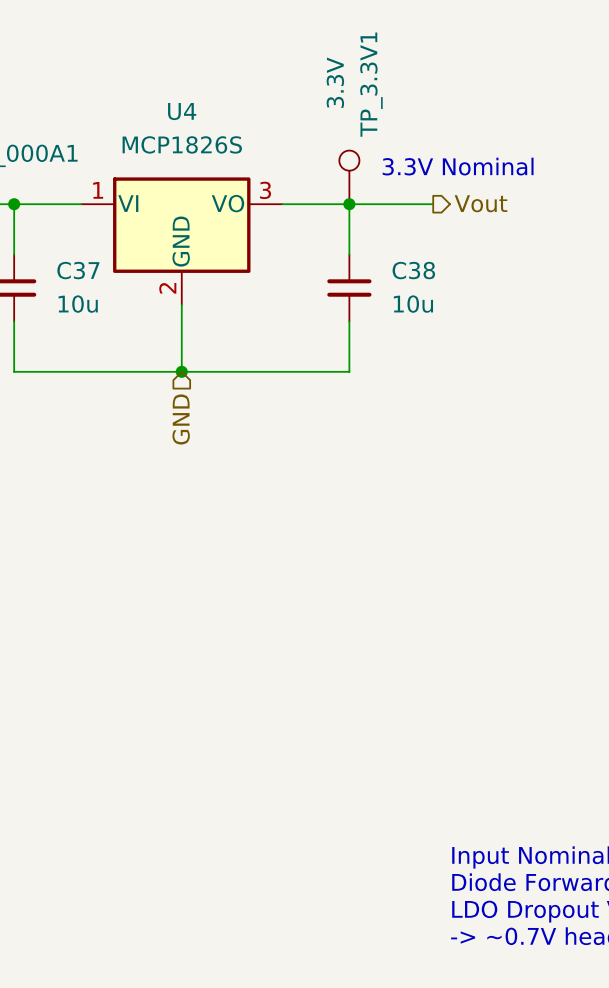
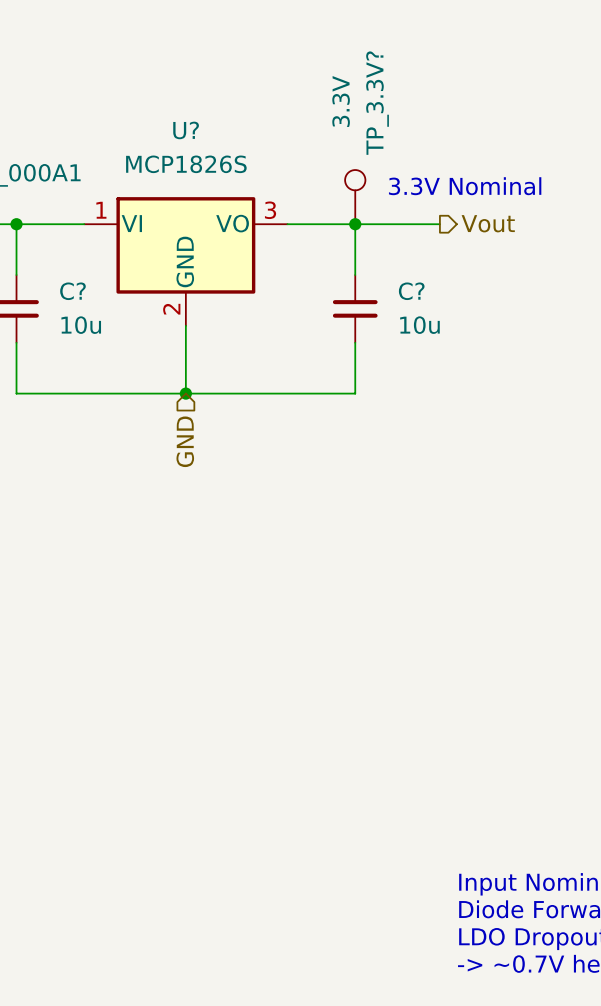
TP_3.3V1 name: TP_3.3V1 (371, 84) -> TP_3.3V? (377, 103)
U4 name: U4 (182, 111) -> U? (186, 130)
C37 name: C37 (78, 270) -> C? (72, 291)
C38 name: C38 (413, 270) -> C? (411, 291)

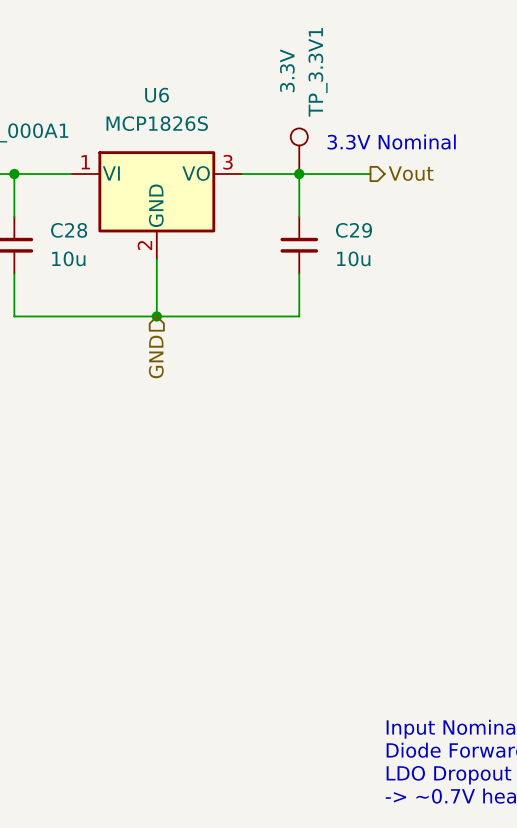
TP_3.3V? name: TP_3.3V? (377, 103) -> TP_3.3V1 (318, 72)
U? name: U? (186, 130) -> U6 (157, 95)
C? name: C? (72, 291) -> C28 (69, 230)
C? name: C? (411, 291) -> C29 (354, 230)

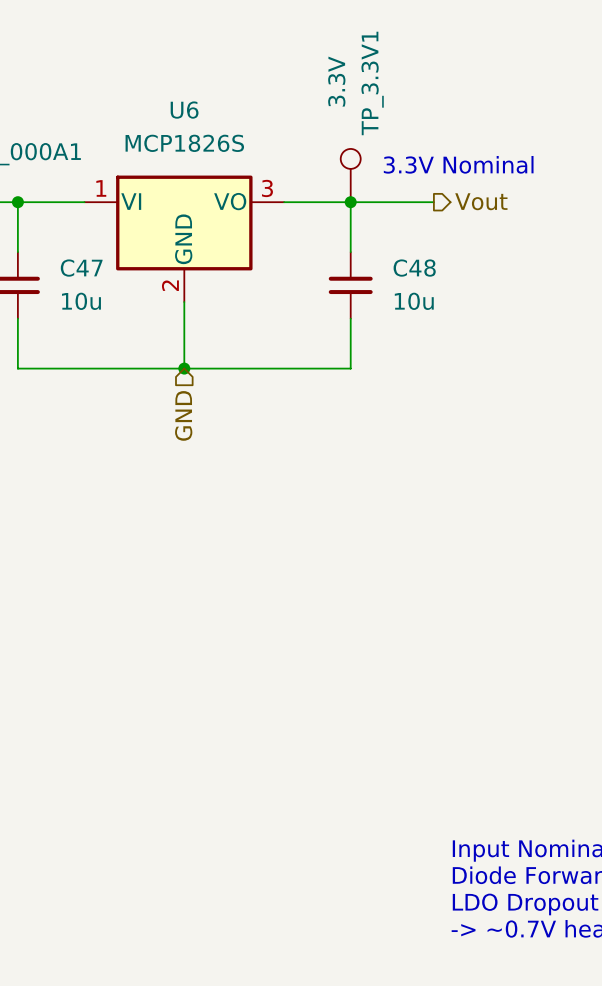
C28 name: C28 (69, 230) -> C47 (81, 268)
C29 name: C29 (354, 230) -> C48 (414, 268)

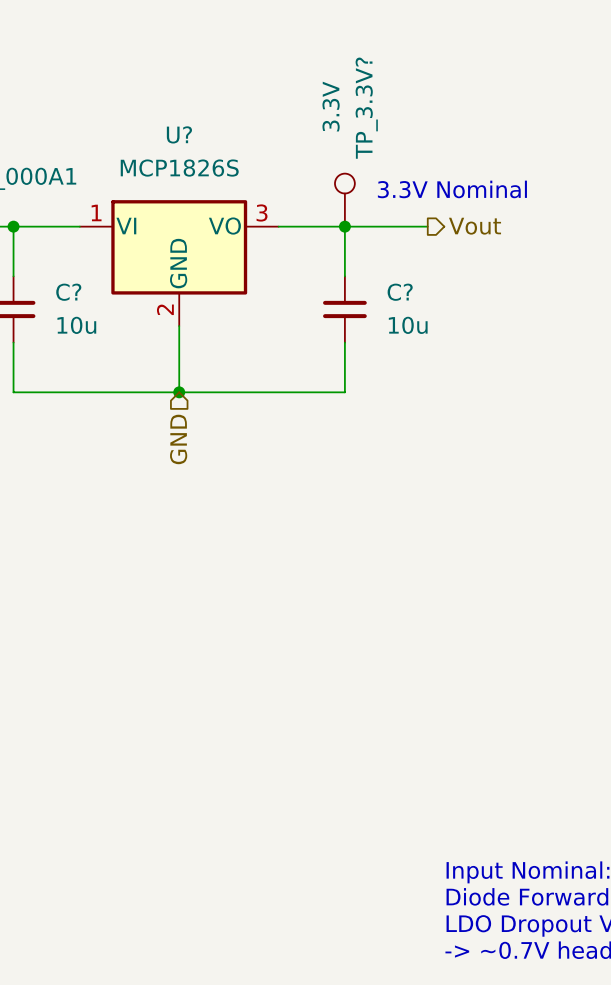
TP_3.3V1 name: TP_3.3V1 (372, 83) -> TP_3.3V? (366, 108)
U6 name: U6 (184, 110) -> U? (179, 134)
C47 name: C47 (81, 268) -> C? (68, 292)
C48 name: C48 (414, 268) -> C? (400, 292)

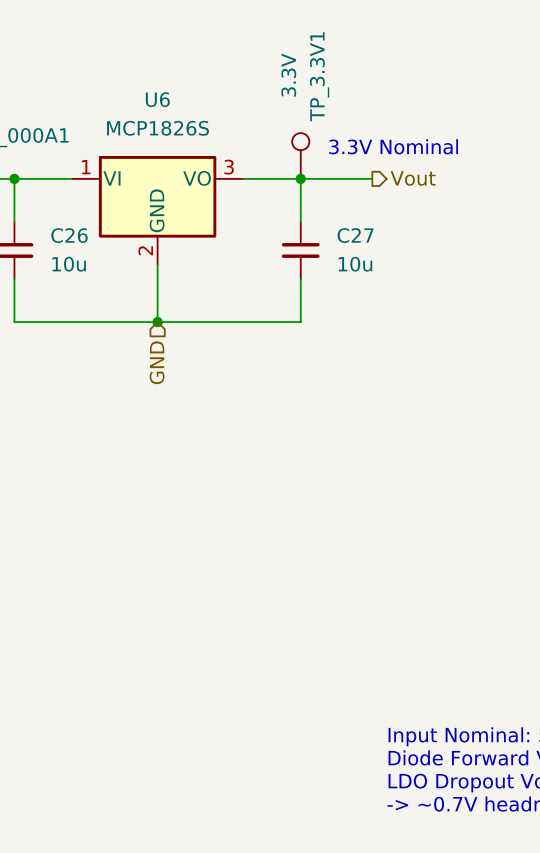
TP_3.3V? name: TP_3.3V? (366, 108) -> TP_3.3V1 (319, 76)
U? name: U? (179, 134) -> U6 (157, 99)
C? name: C? (68, 292) -> C26 (69, 235)
C? name: C? (400, 292) -> C27 (355, 235)

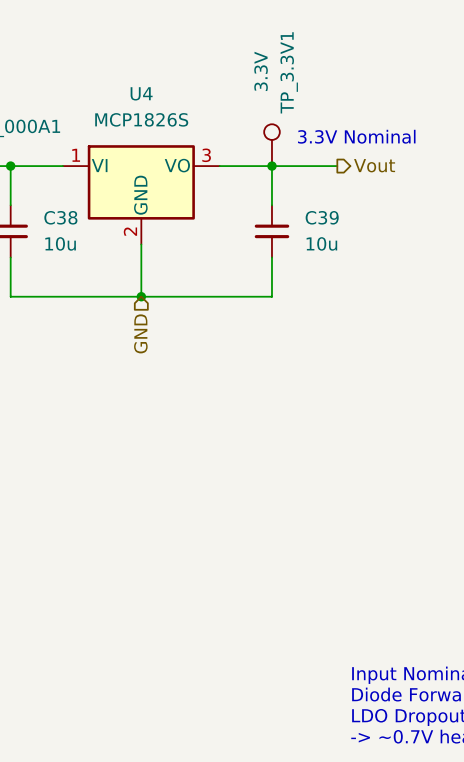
U6 name: U6 (157, 99) -> U4 (141, 93)
C26 name: C26 (69, 235) -> C38 (60, 217)
C27 name: C27 (355, 235) -> C39 (322, 217)

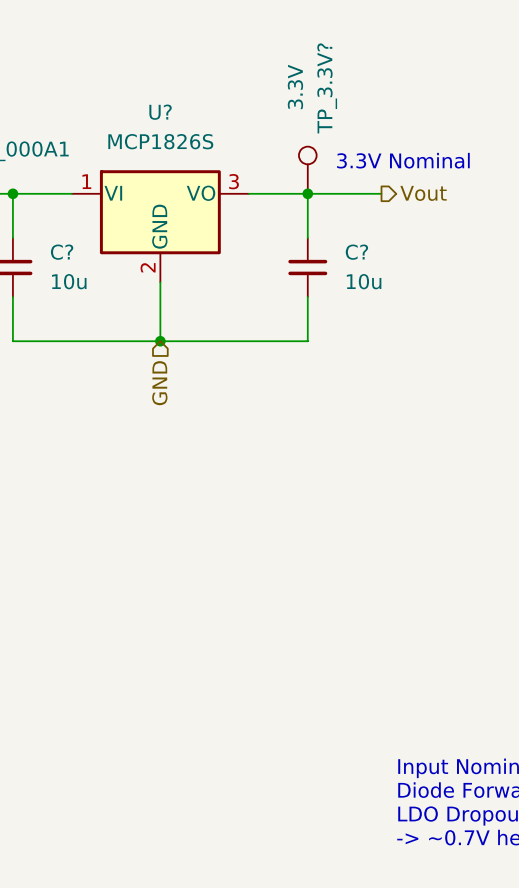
TP_3.3V1 name: TP_3.3V1 (289, 72) -> TP_3.3V? (327, 88)
U4 name: U4 (141, 93) -> U? (160, 112)
C38 name: C38 (60, 217) -> C? (62, 252)
C39 name: C39 (322, 217) -> C? (356, 252)

